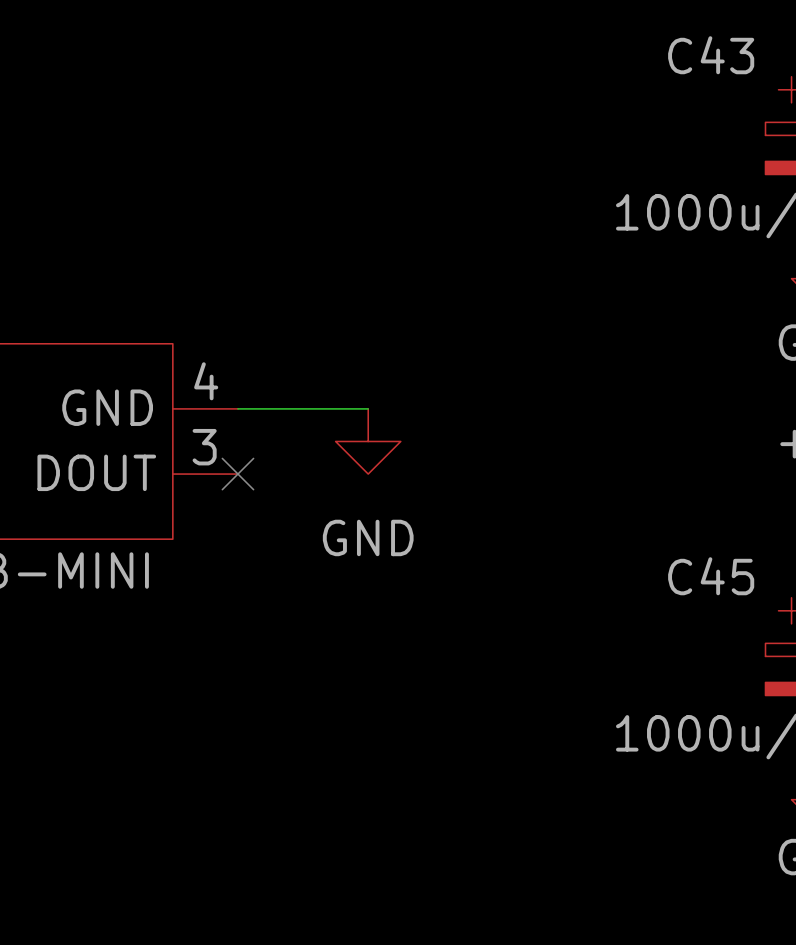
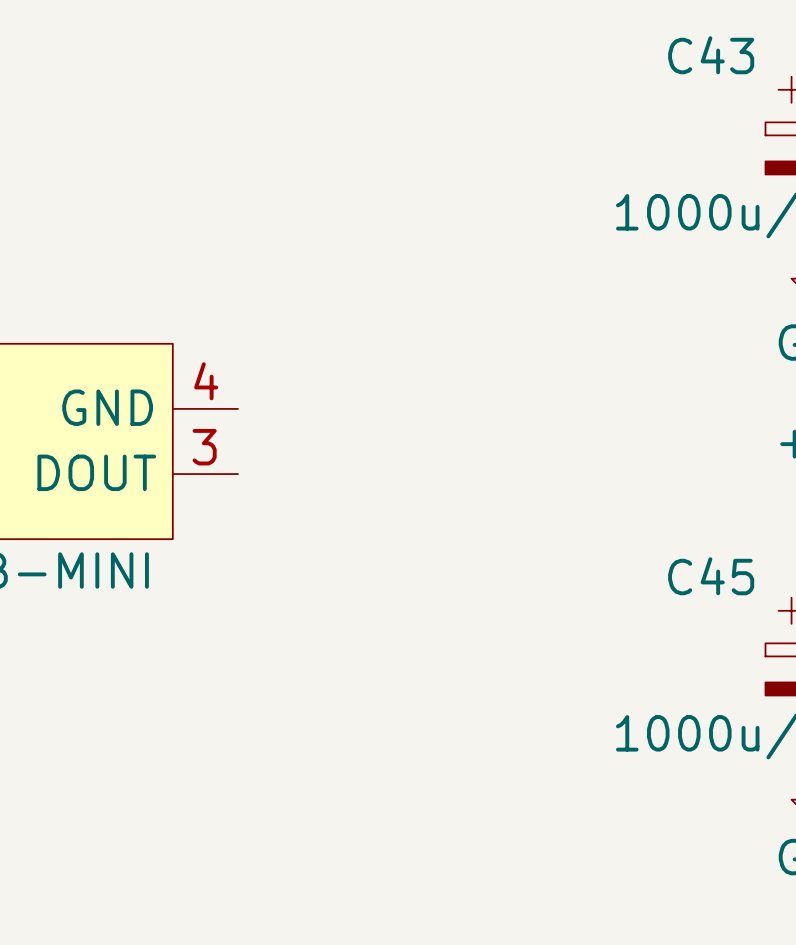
wire: (237, 408) (368, 408) -> none
power symbol: GND (368, 441) -> none
no-connect mark: (237, 474) -> none

